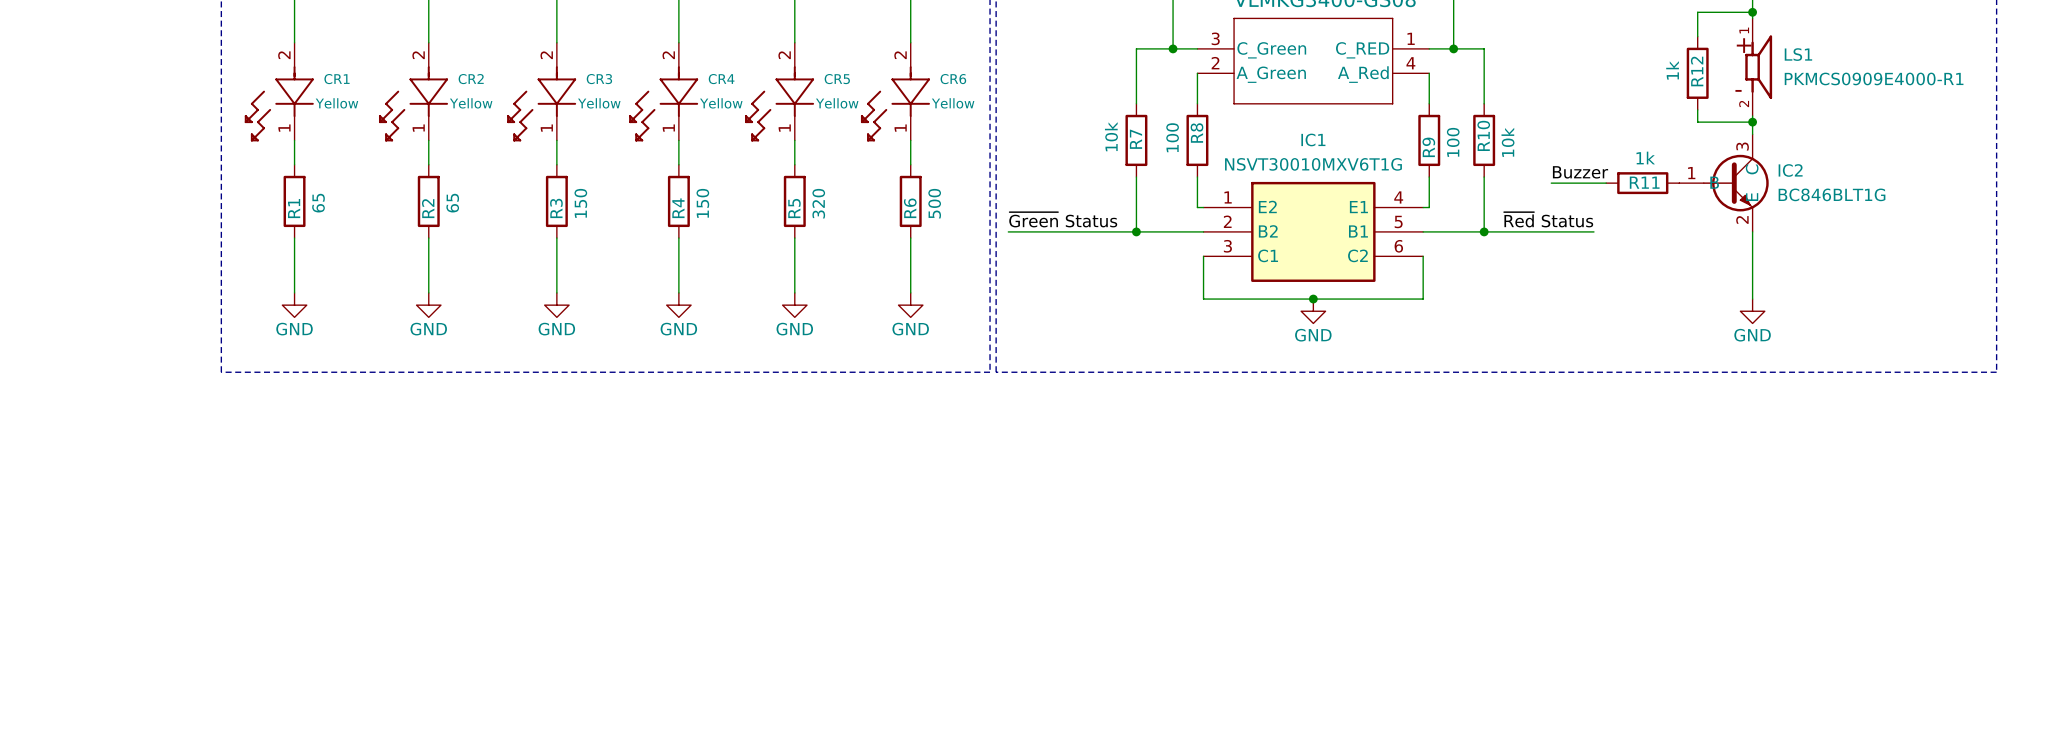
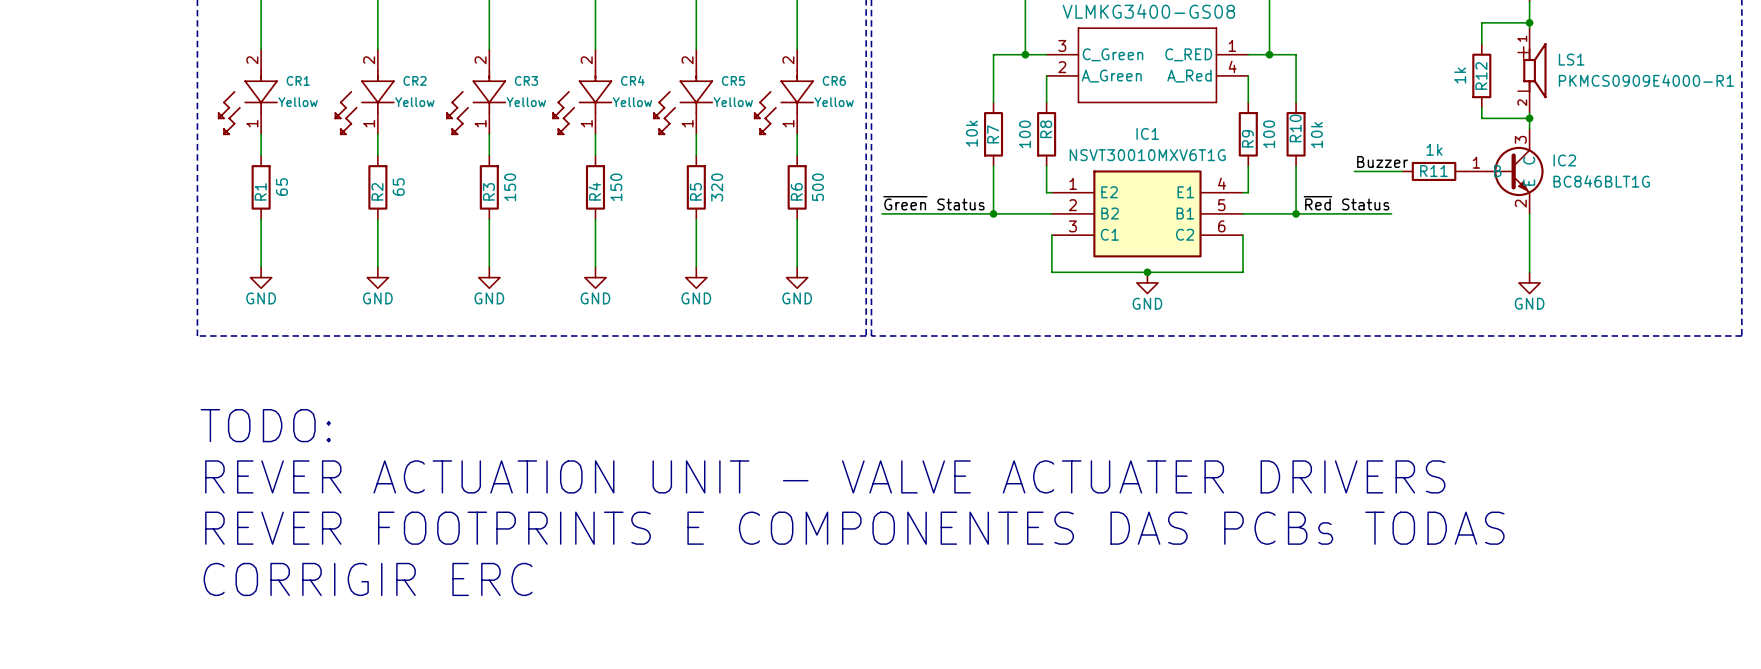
text: none -> TODO: (265, 425)
text: none -> REVER ACTUATION UNIT - VALVE ACTUATER DRIVERS (825, 476)
text: none -> REVER FOOTPRINTS E COMPONENTES DAS PCBs TODAS (854, 528)
text: none -> CORRIGIR ERC (368, 579)

